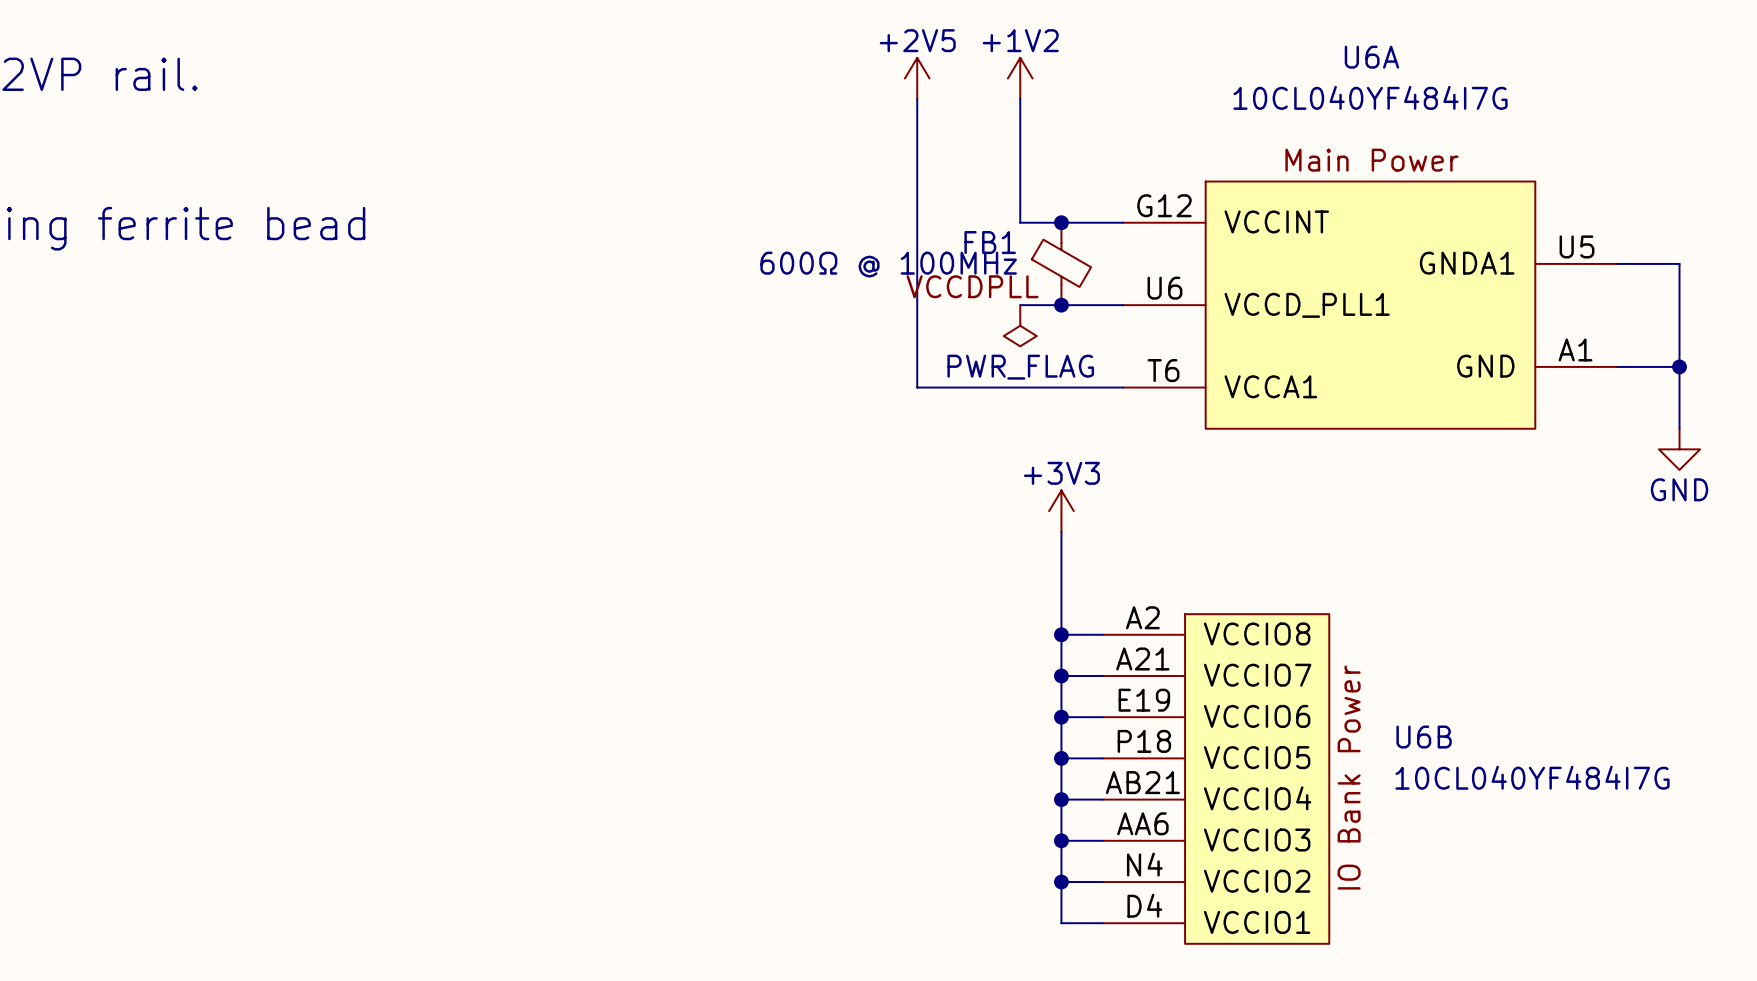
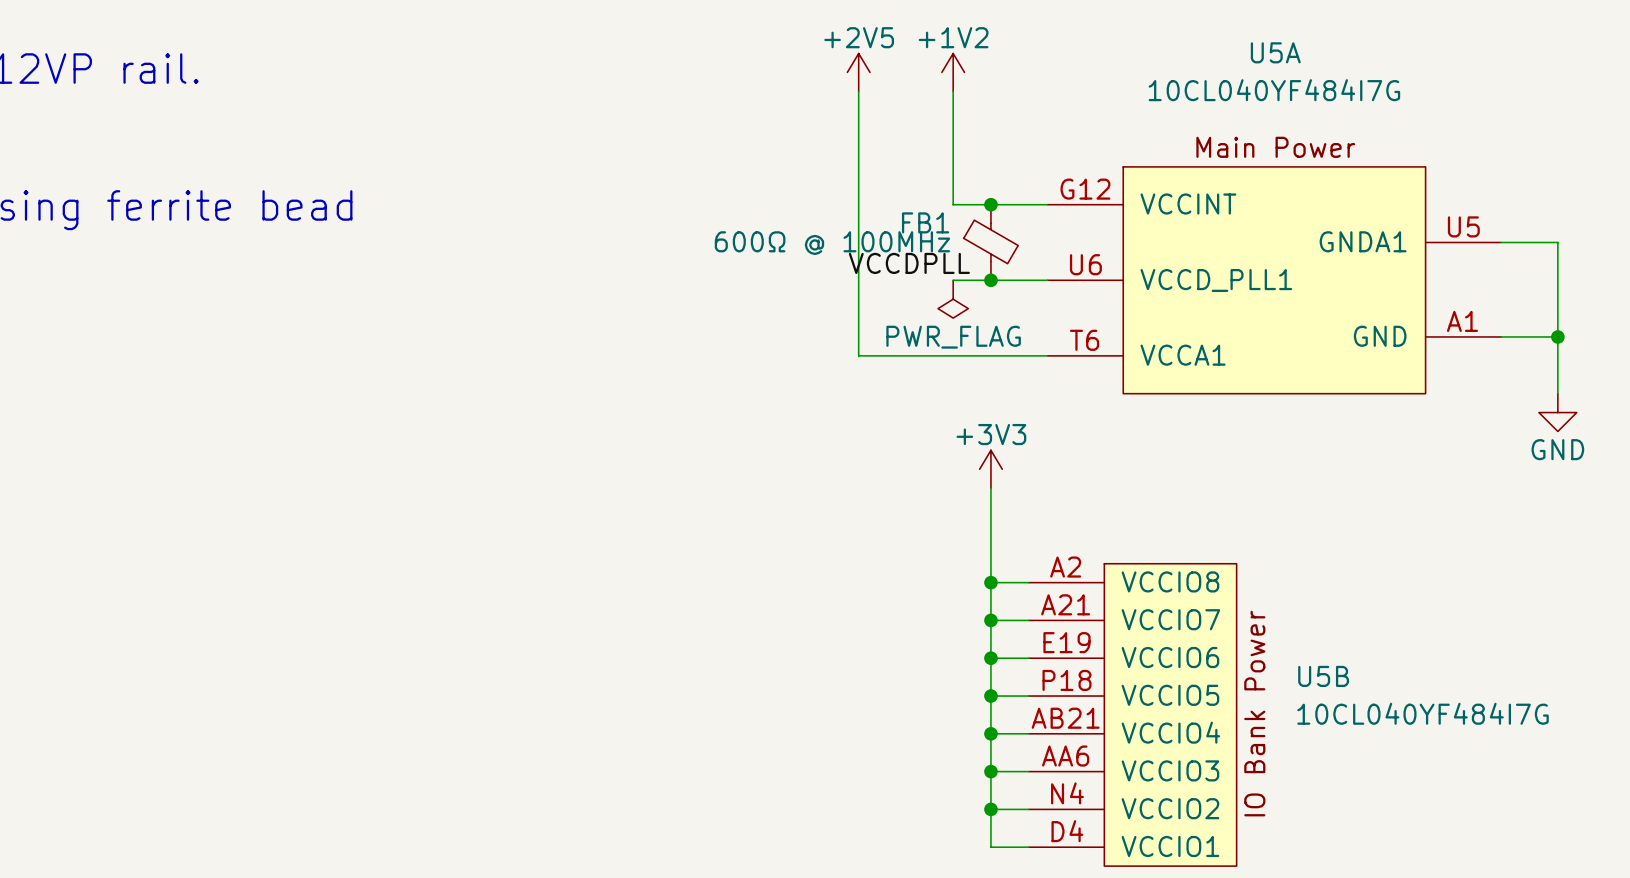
U6A name: U6A (1371, 57) -> U5A (1275, 52)
U6B name: U6B (1424, 737) -> U5B (1323, 676)

